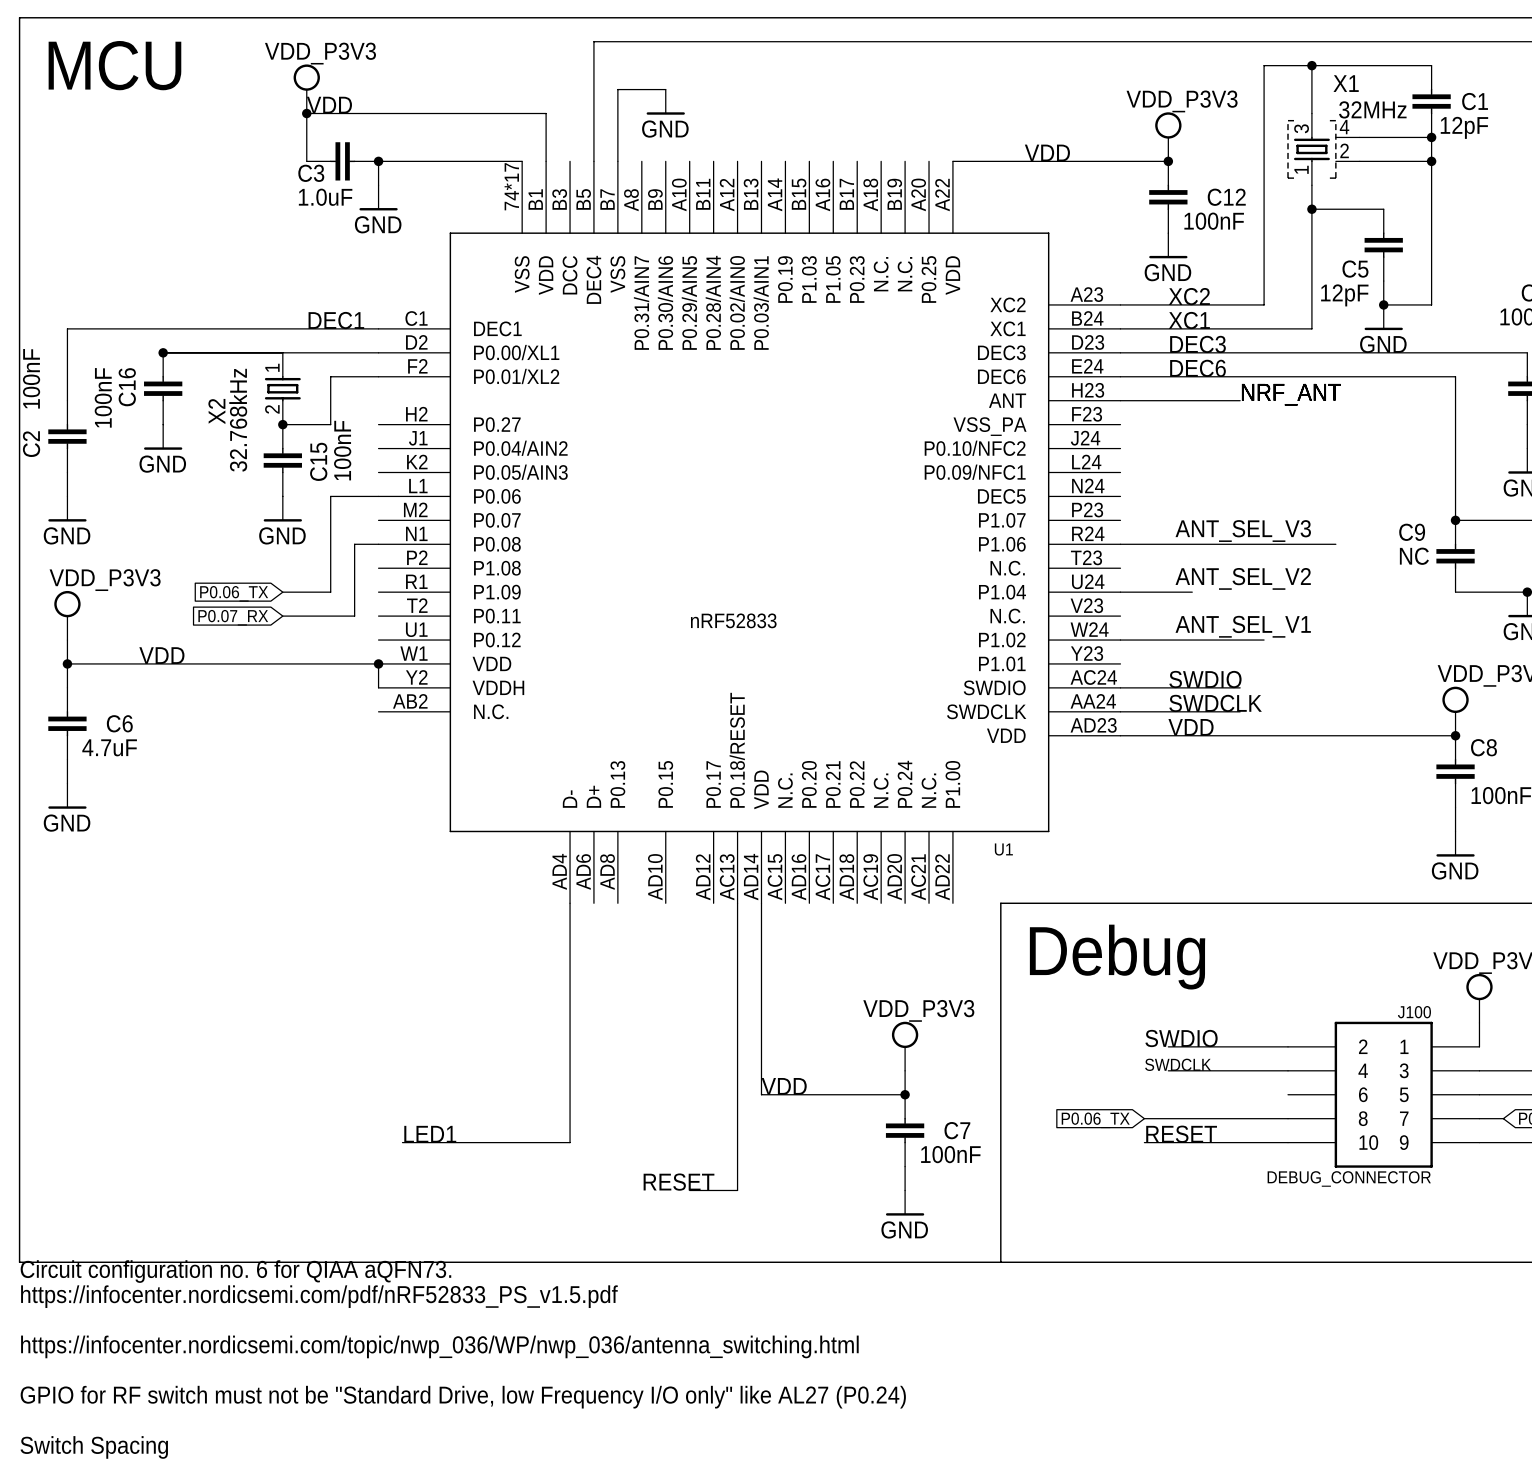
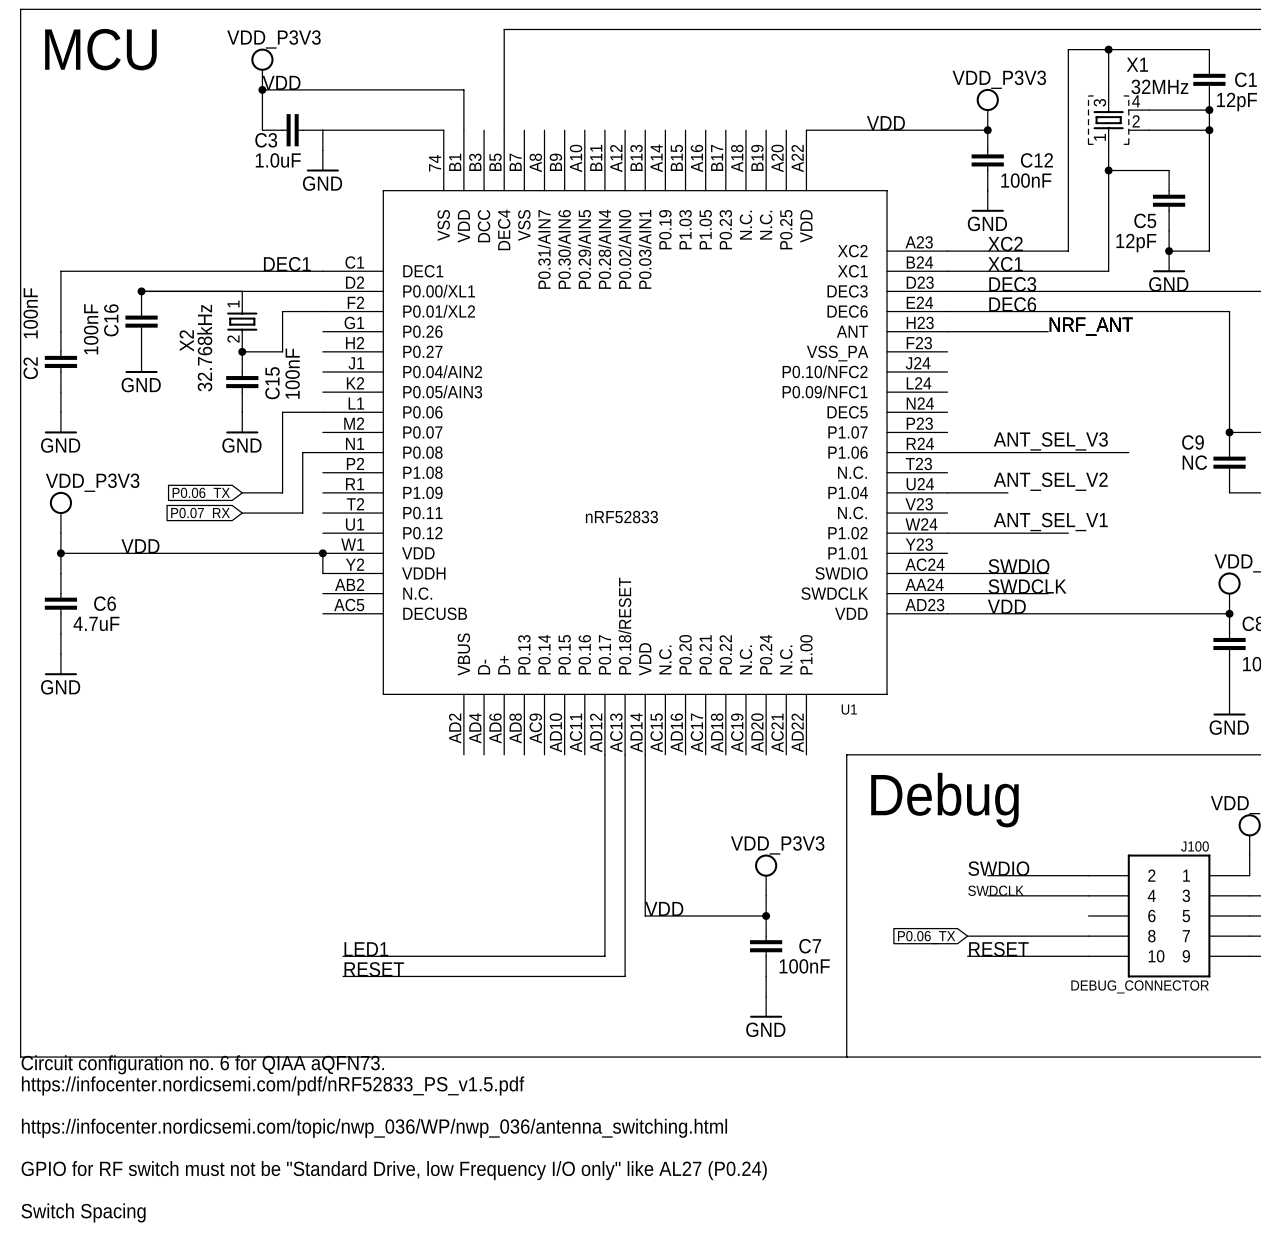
wire: (665, 89) (617, 89) (617, 161) -> none
power symbol: GND (665, 102) -> none
U1 symbol: [378, 161, 1121, 904] -> [322, 130, 948, 755]
junction: (378, 161) -> none
wire: (570, 903) (570, 1142) -> (604, 754) (604, 956) (484, 956)
label: none -> RESET (374, 969)
wire: (737, 1166) (737, 1190) (689, 1190) -> (625, 976) (343, 976)
label: RESET (679, 1182) -> none

